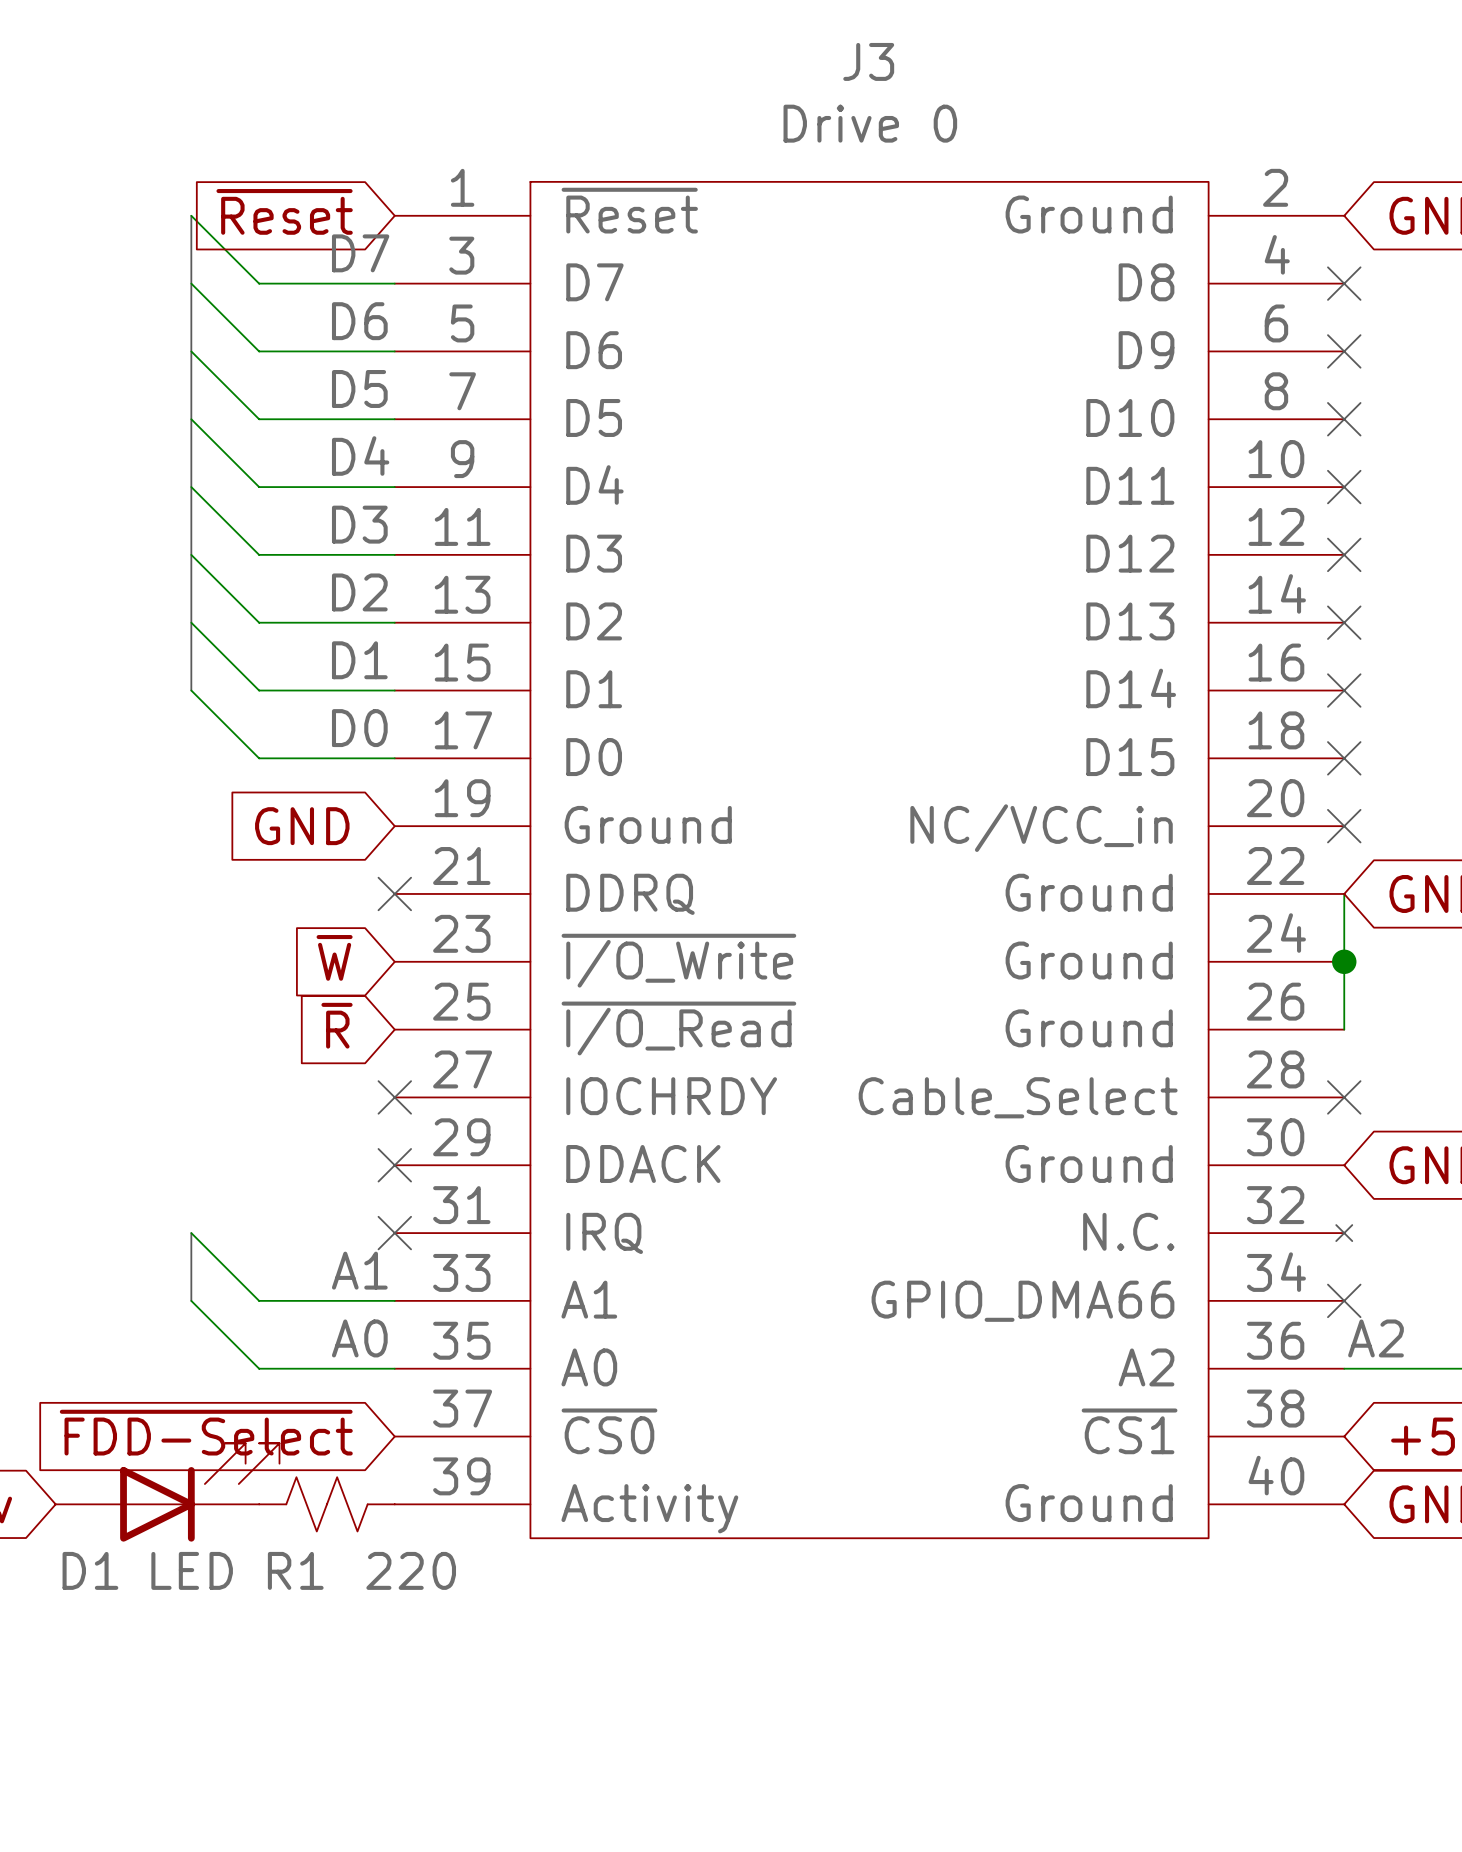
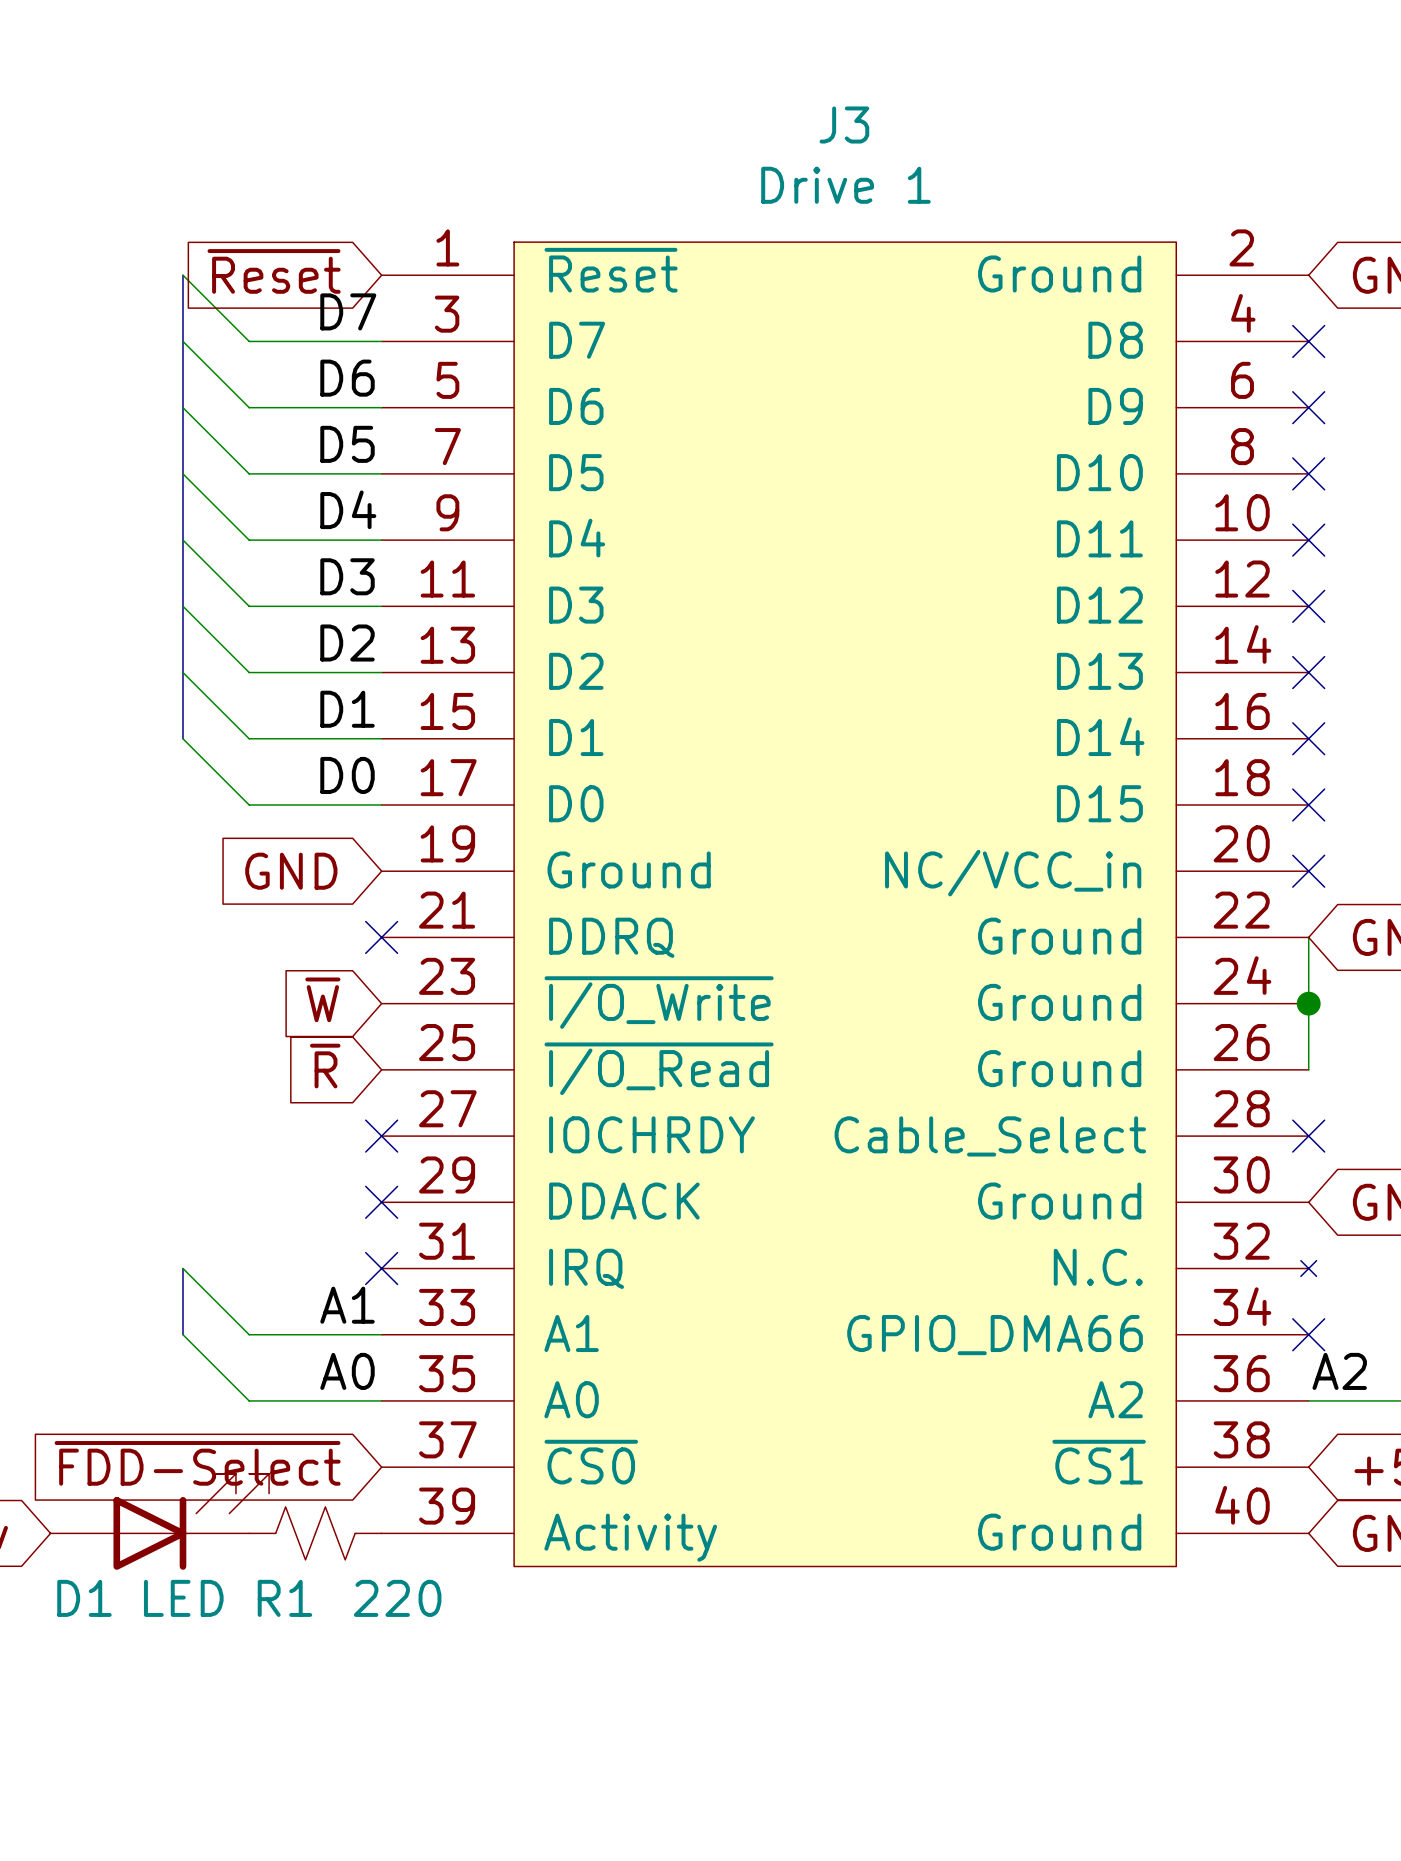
J3 value: Drive 0 (870, 123) -> Drive 1 (845, 185)

